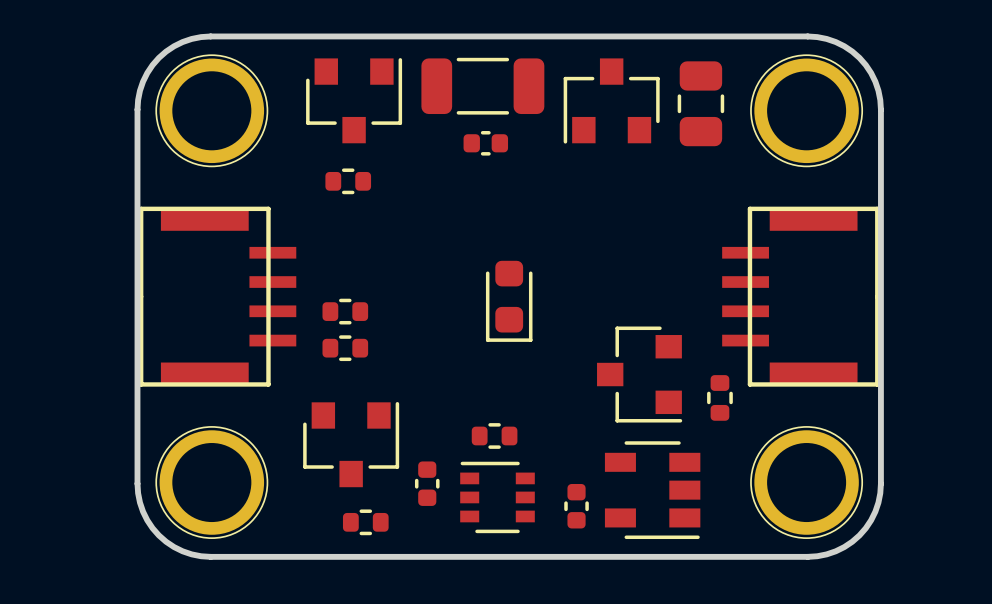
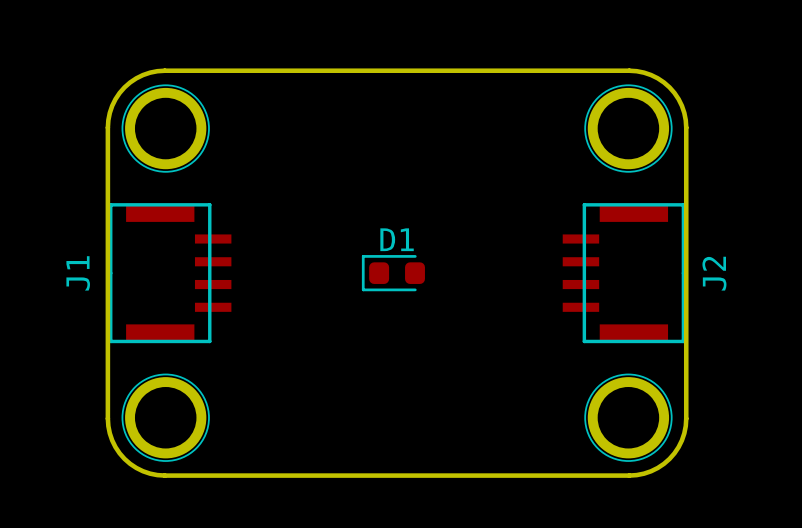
part: (482, 86) -> none
part: (354, 100) -> none
part: (611, 100) -> none
part: (700, 103) -> none
part: (485, 143) -> none
part: (348, 181) -> none
D1: none -> (393, 273)
J1 name: none -> J1 (78, 273)
J2 name: none -> J2 (714, 273)
part: (509, 301) -> none
part: (345, 311) -> none
part: (345, 348) -> none
part: (639, 374) -> none
part: (719, 397) -> none
part: (494, 435) -> none
part: (351, 444) -> none
part: (427, 483) -> none
part: (652, 490) -> none
part: (497, 497) -> none
part: (576, 506) -> none
part: (365, 522) -> none

